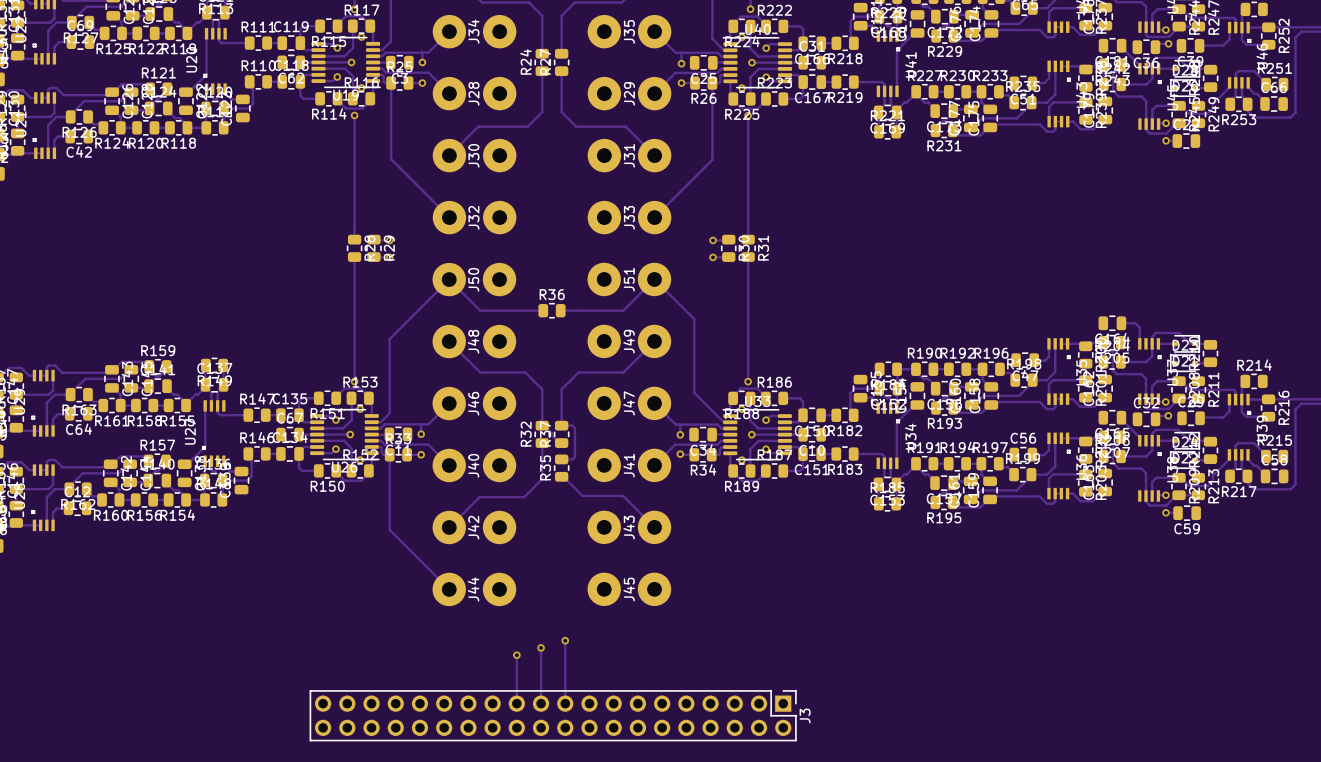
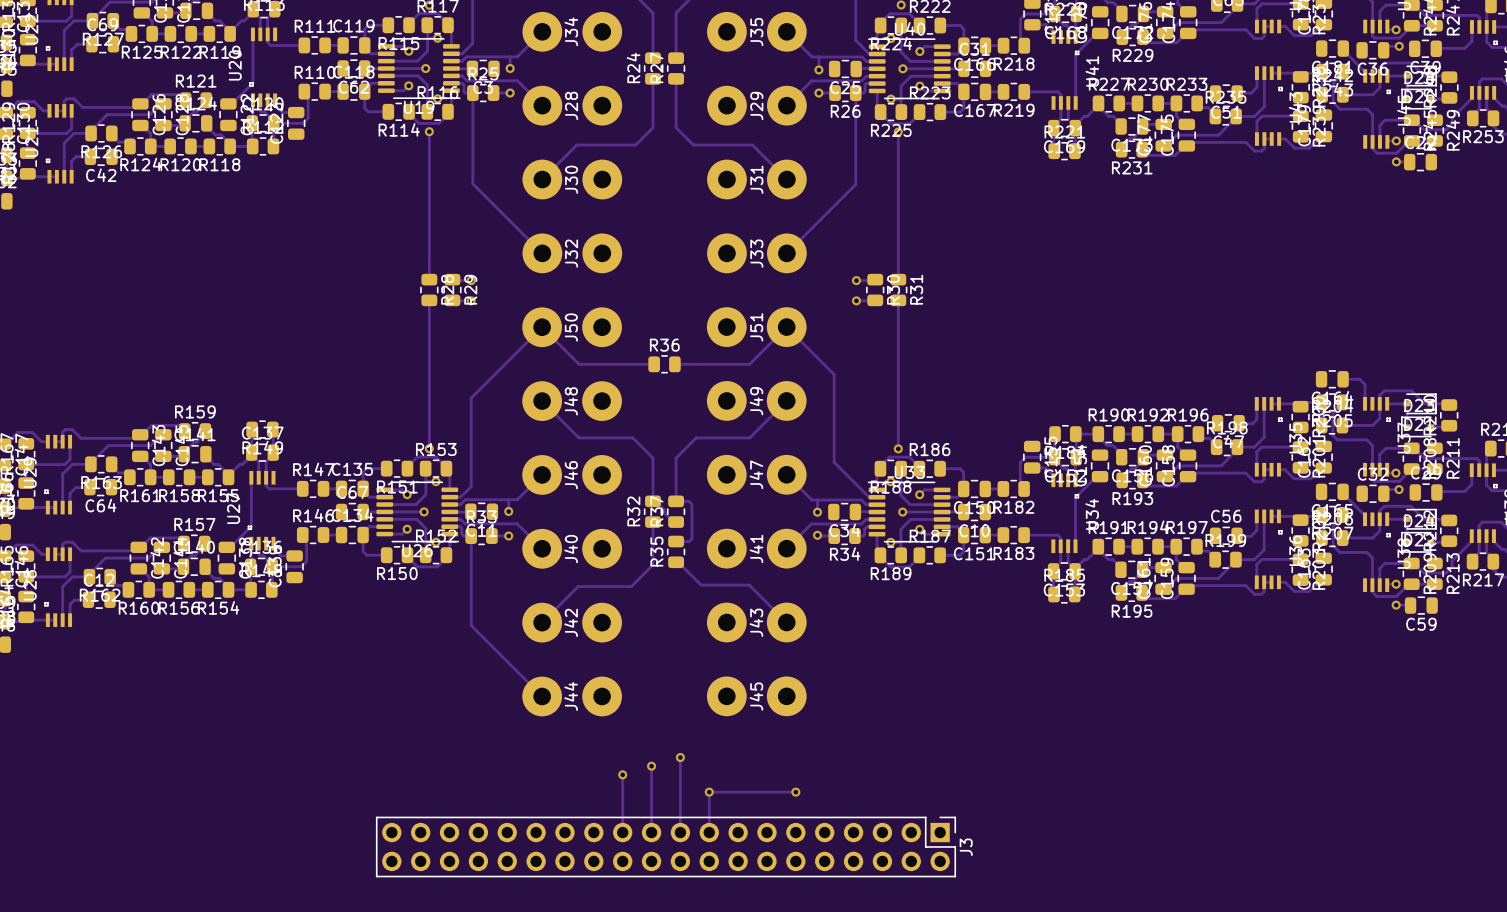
via: none -> (709, 792)
track: none -> (795, 792) (709, 792) (709, 832)
via: none -> (795, 792)

